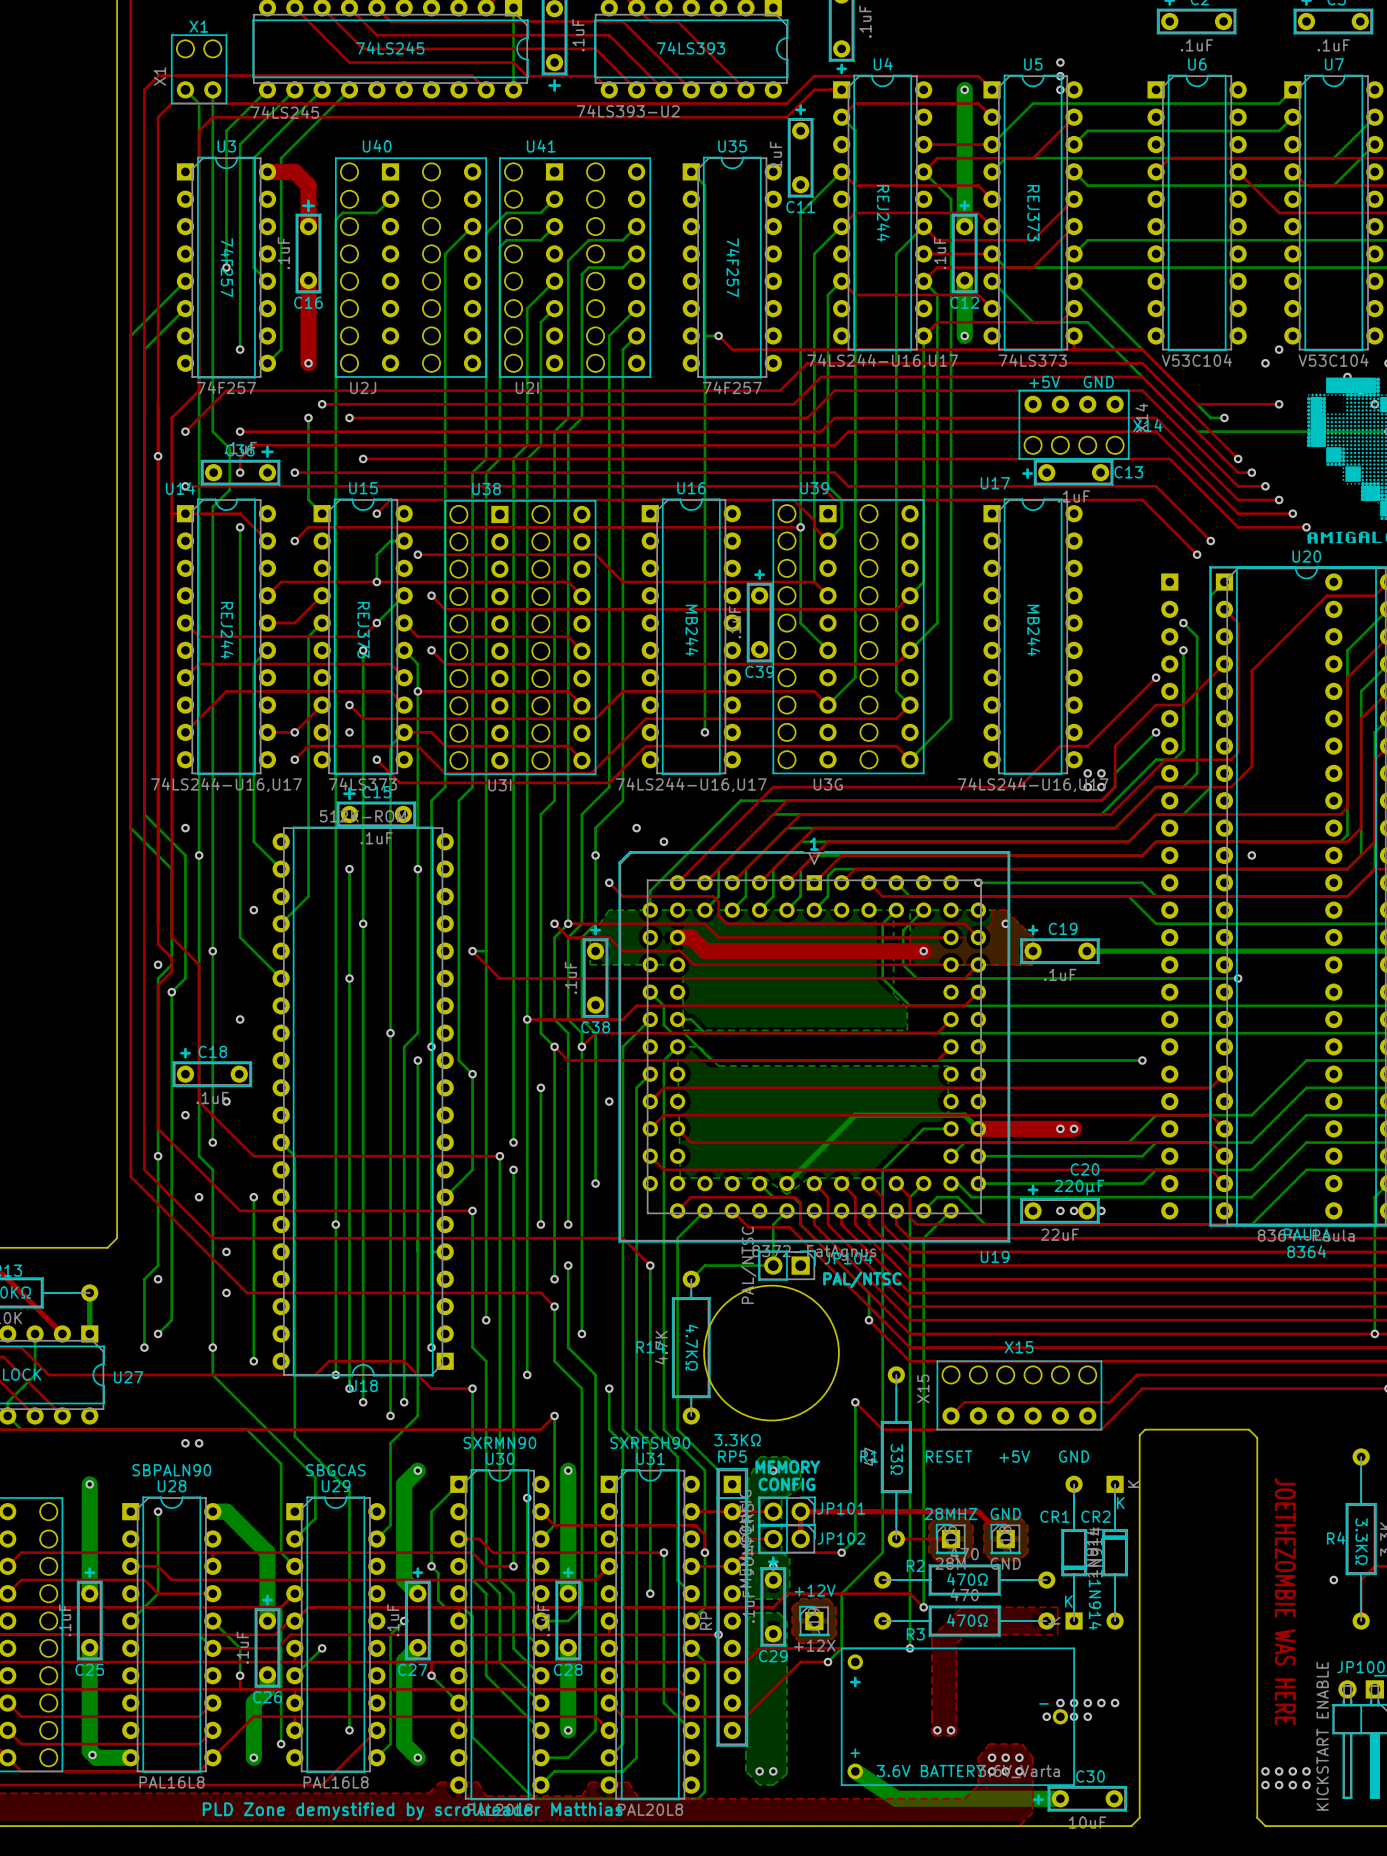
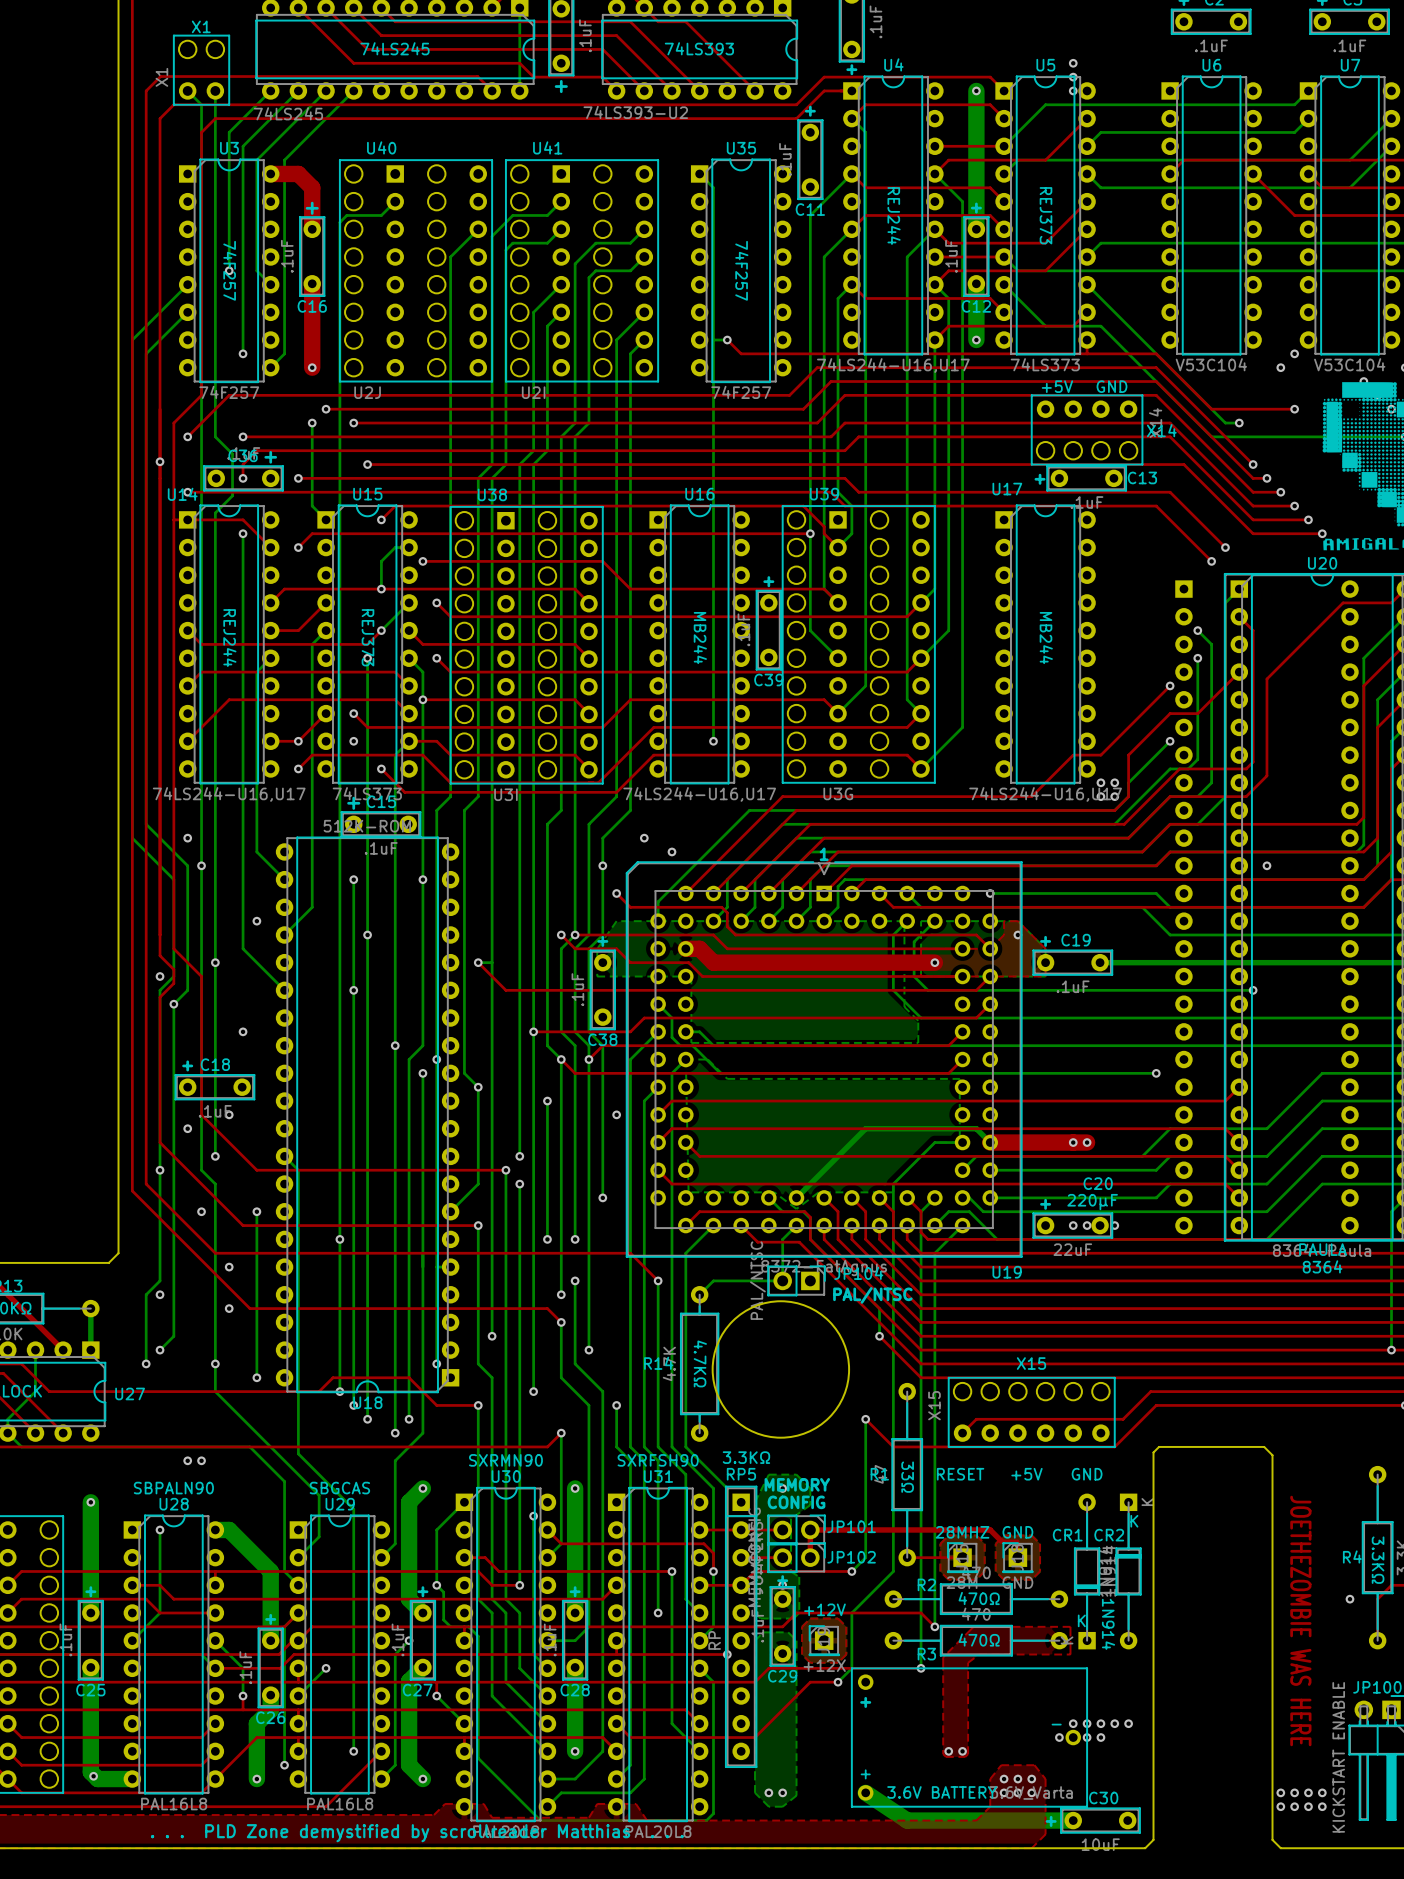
text: PLD Zone demystified by scrollreader Matthias (412, 1811) -> . . . PLD Zone demystified by scrollreader Matthias . . . (417, 1833)

